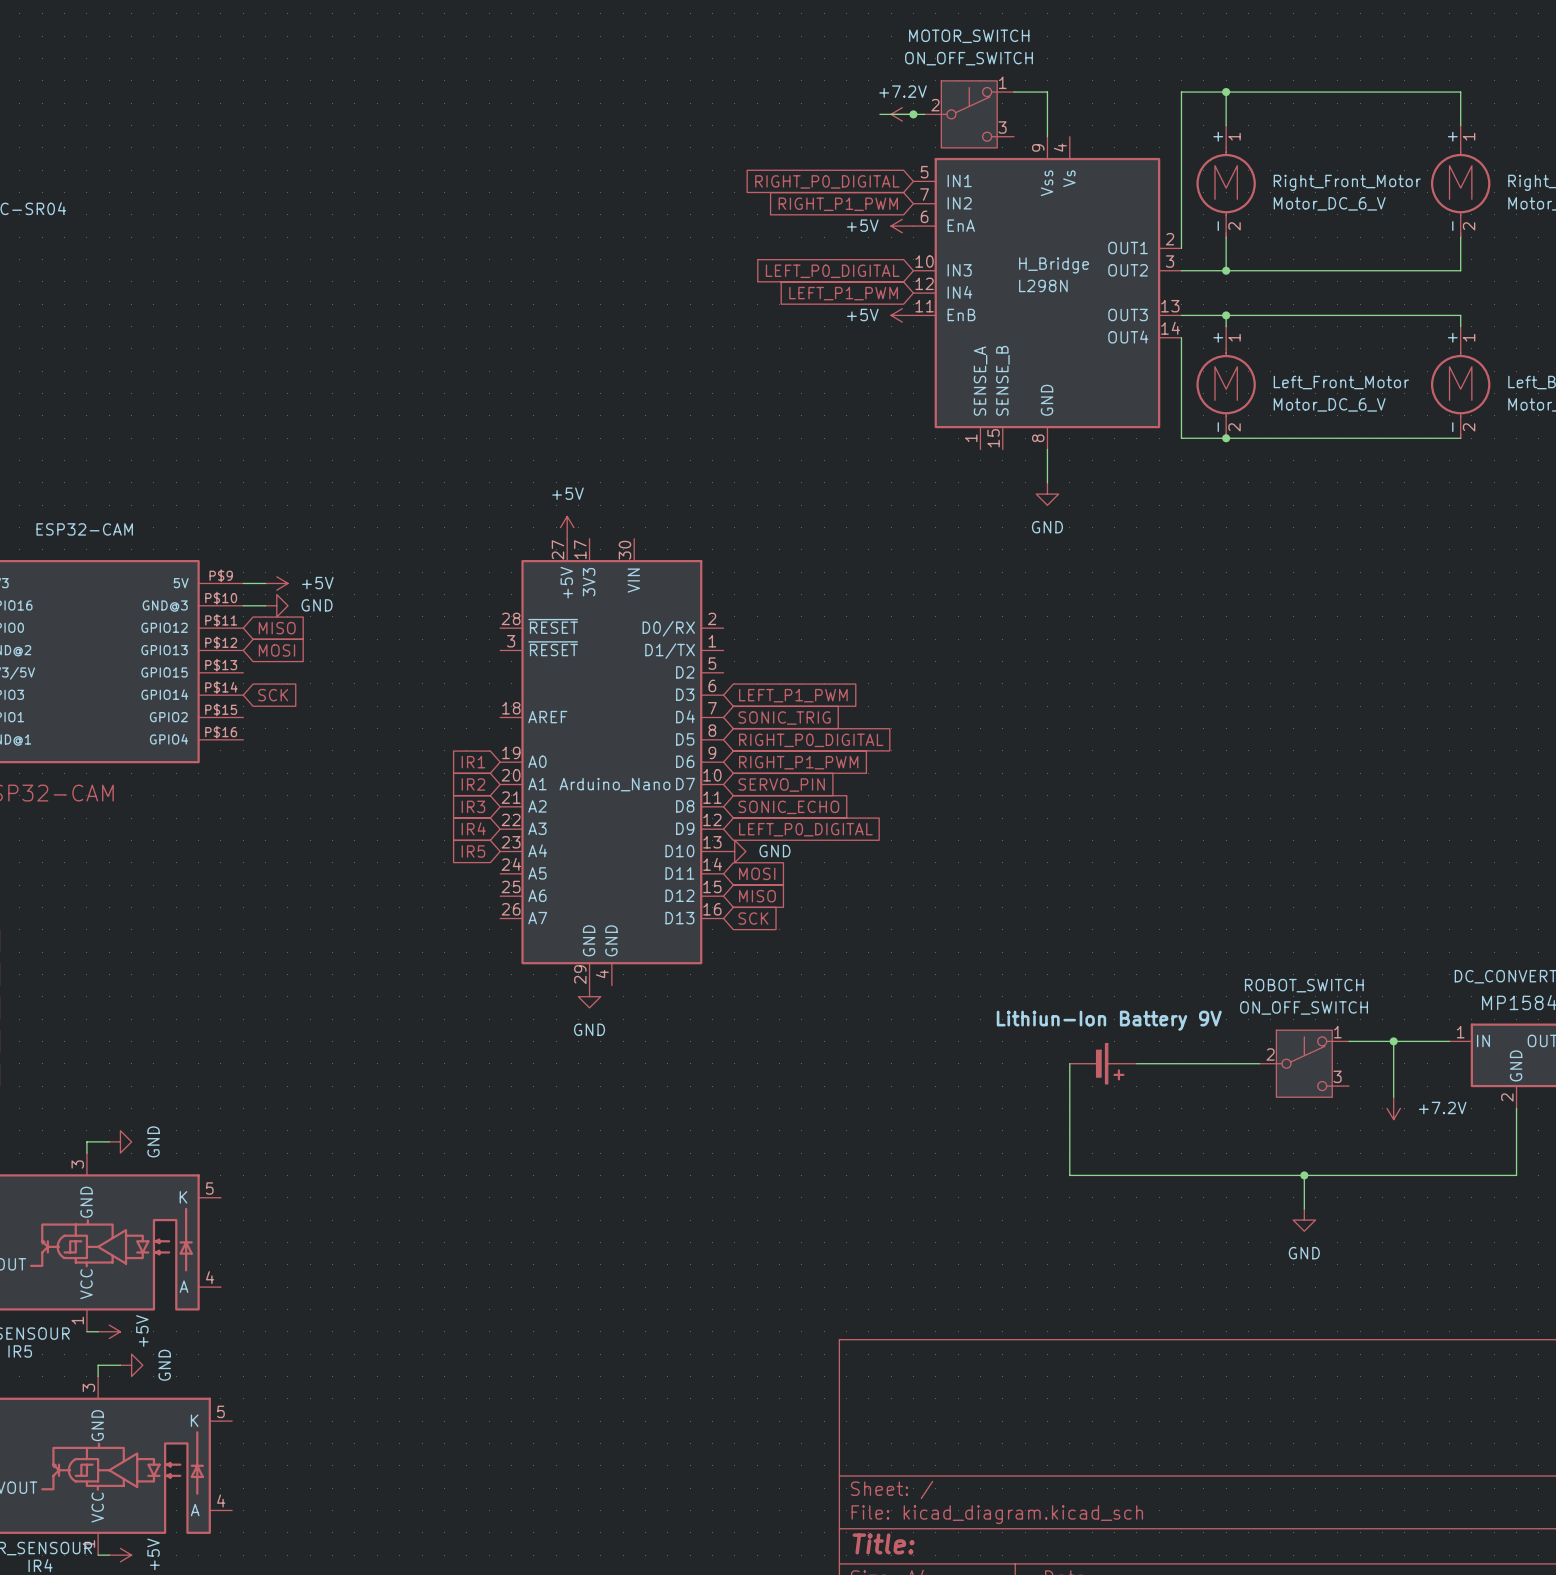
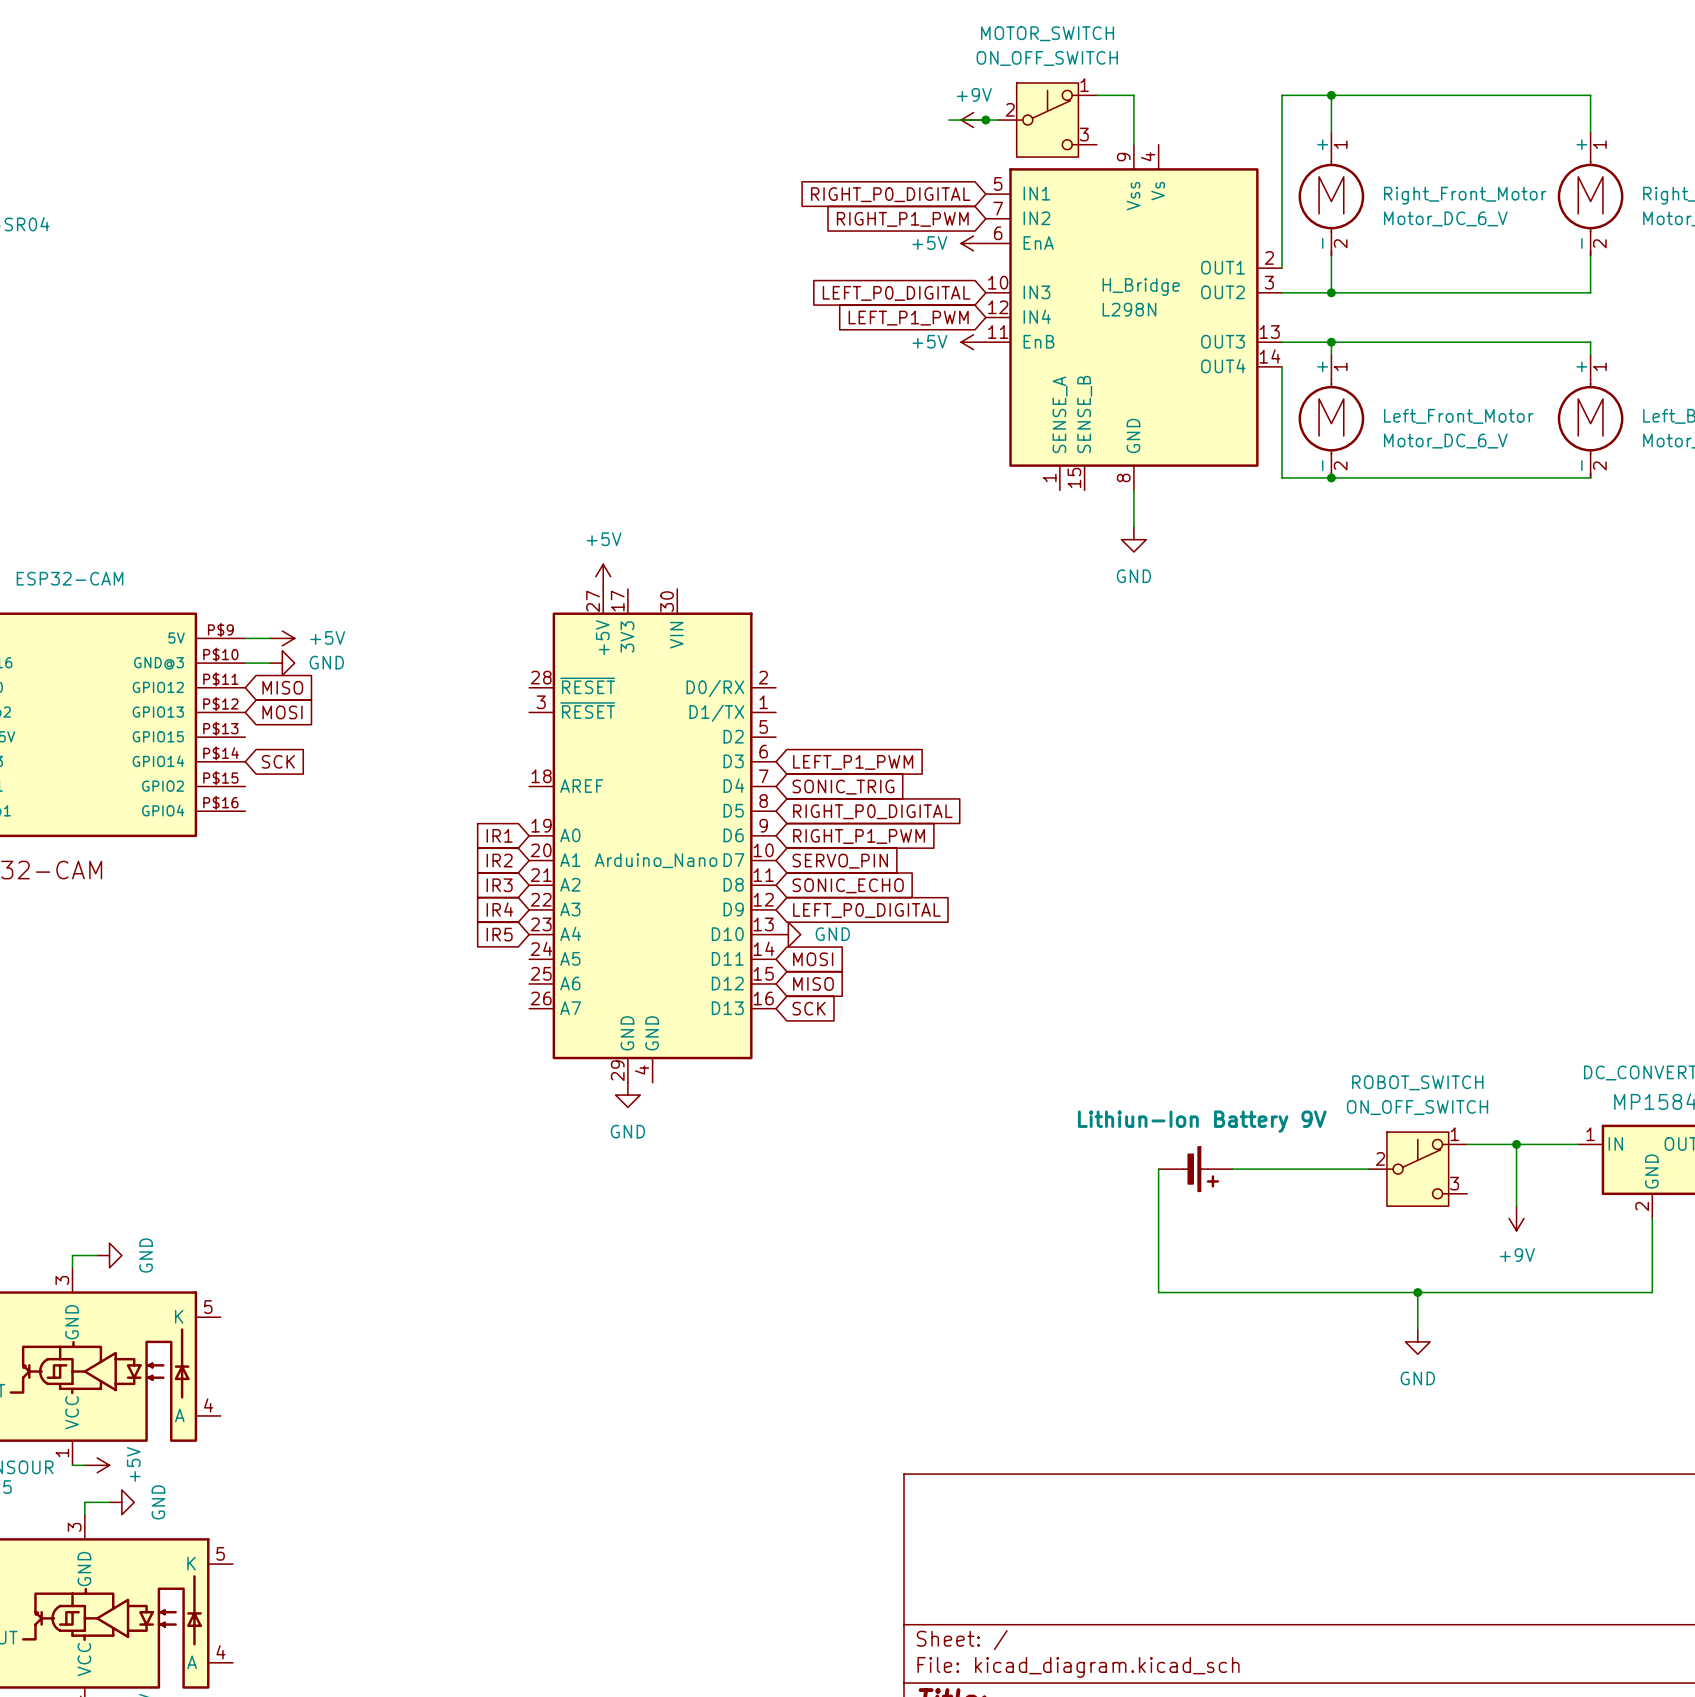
power symbol: +7.2V (902, 114) -> +9V (973, 120)
power symbol: +7.2V (1393, 1108) -> +9V (1516, 1218)

